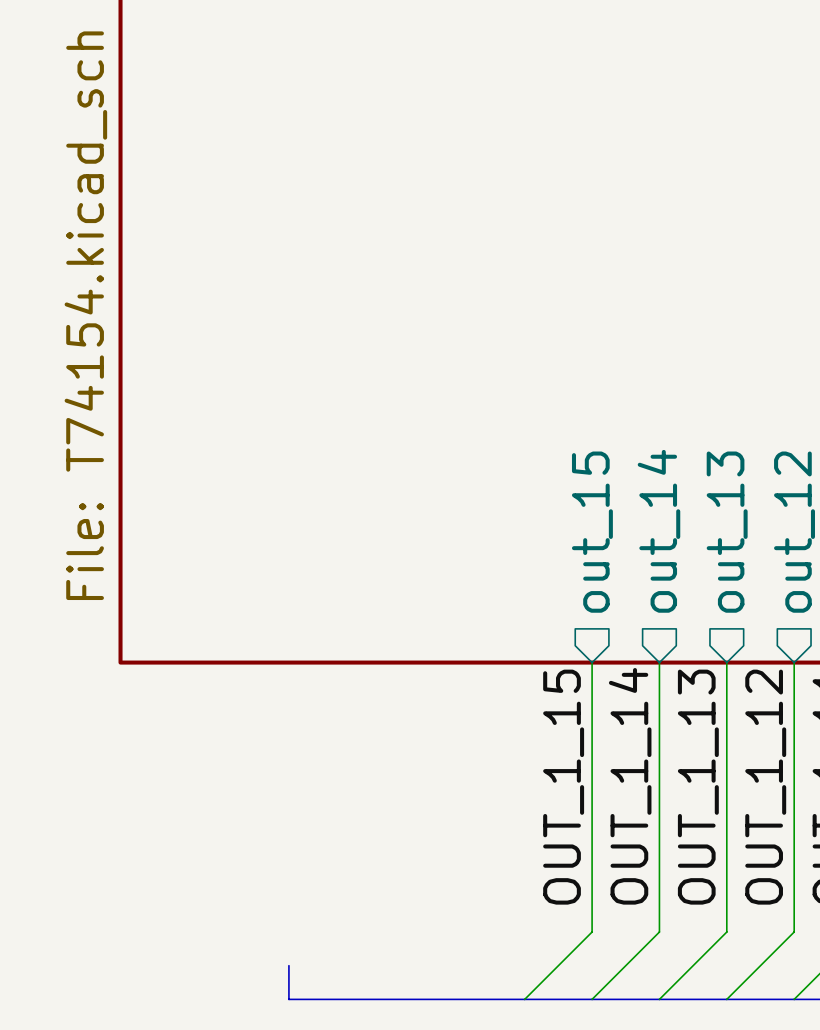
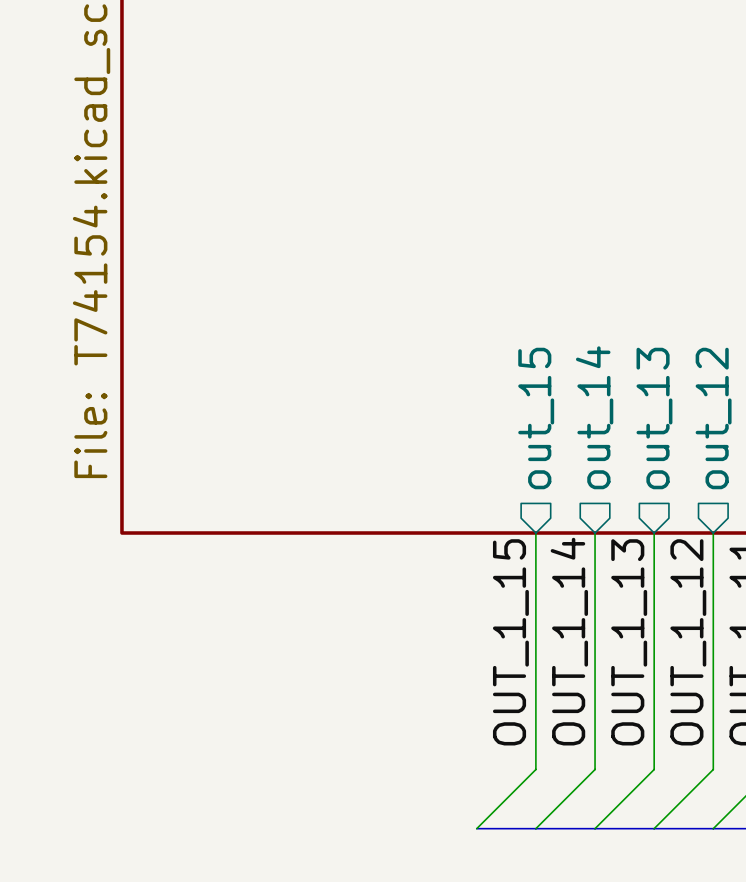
bus: (288, 965) (288, 999) (524, 999) -> none

